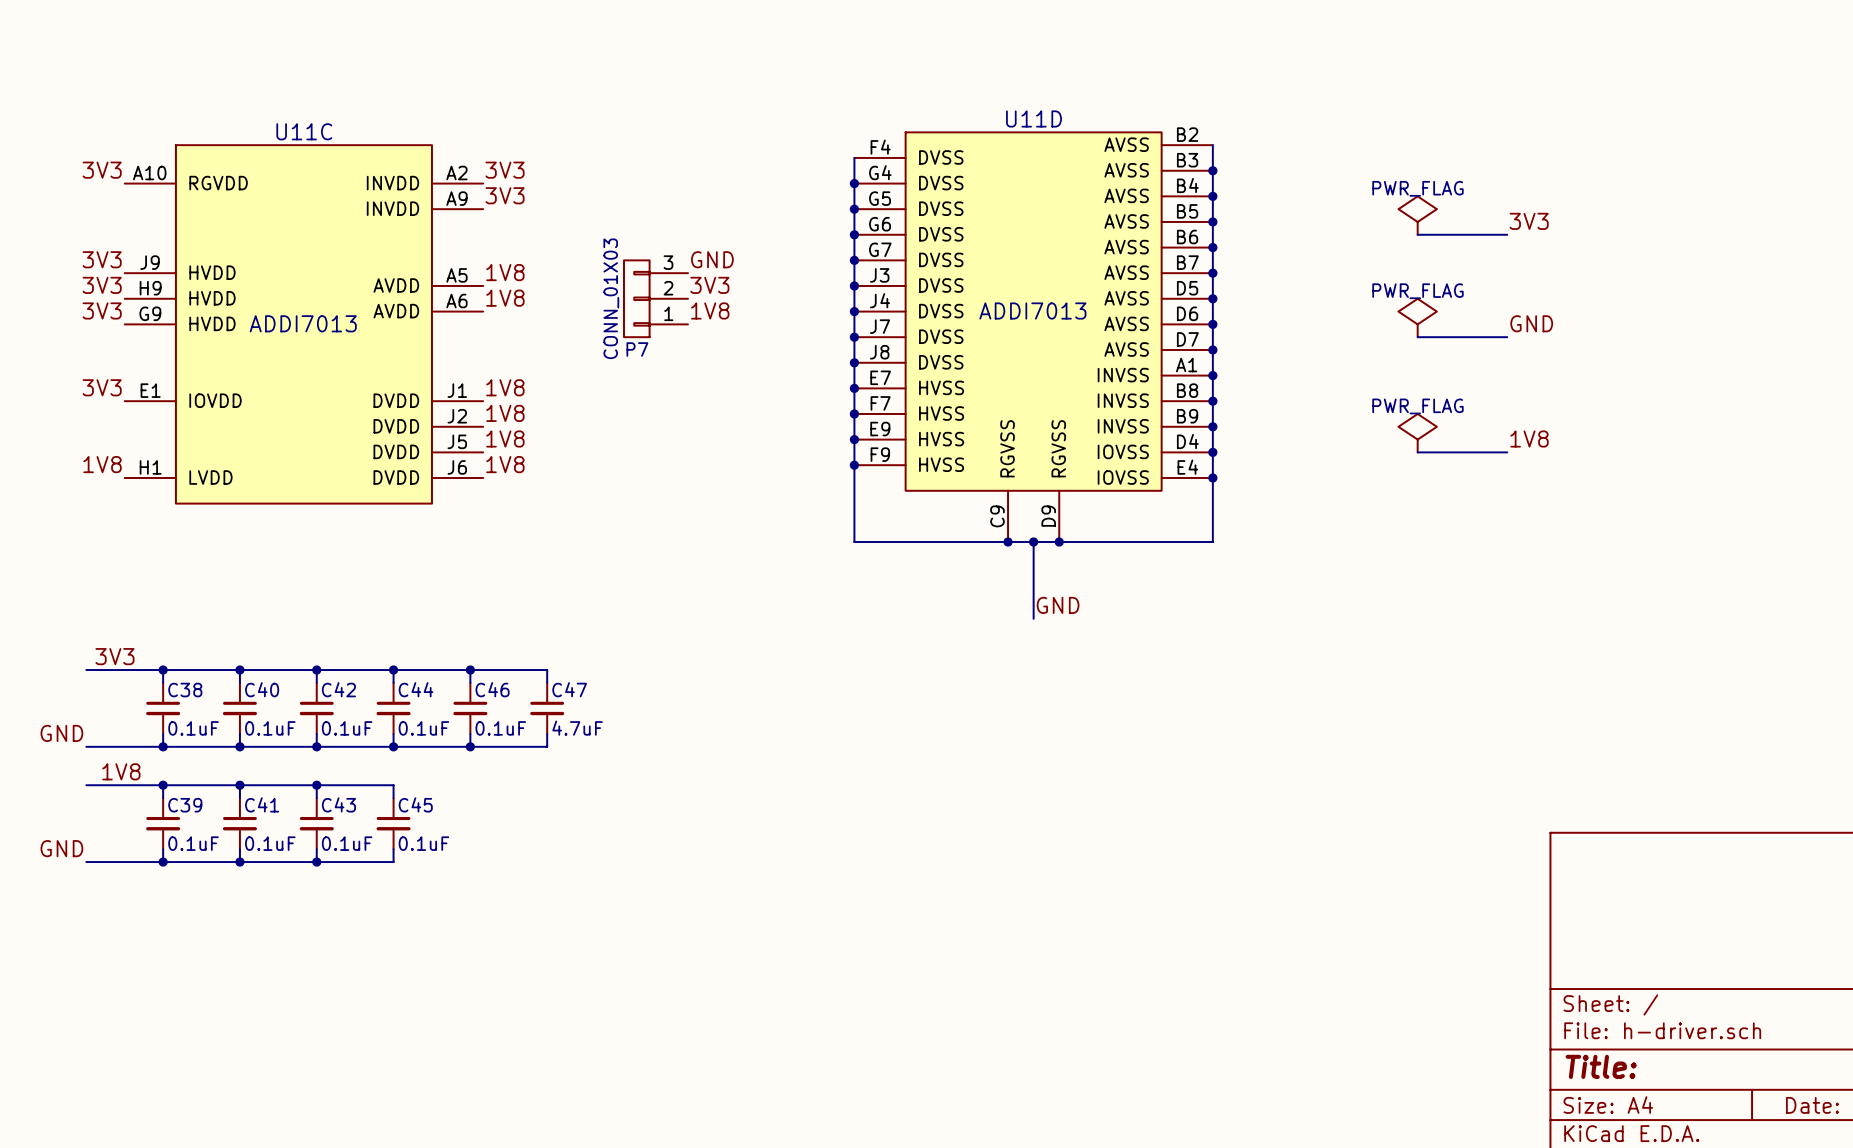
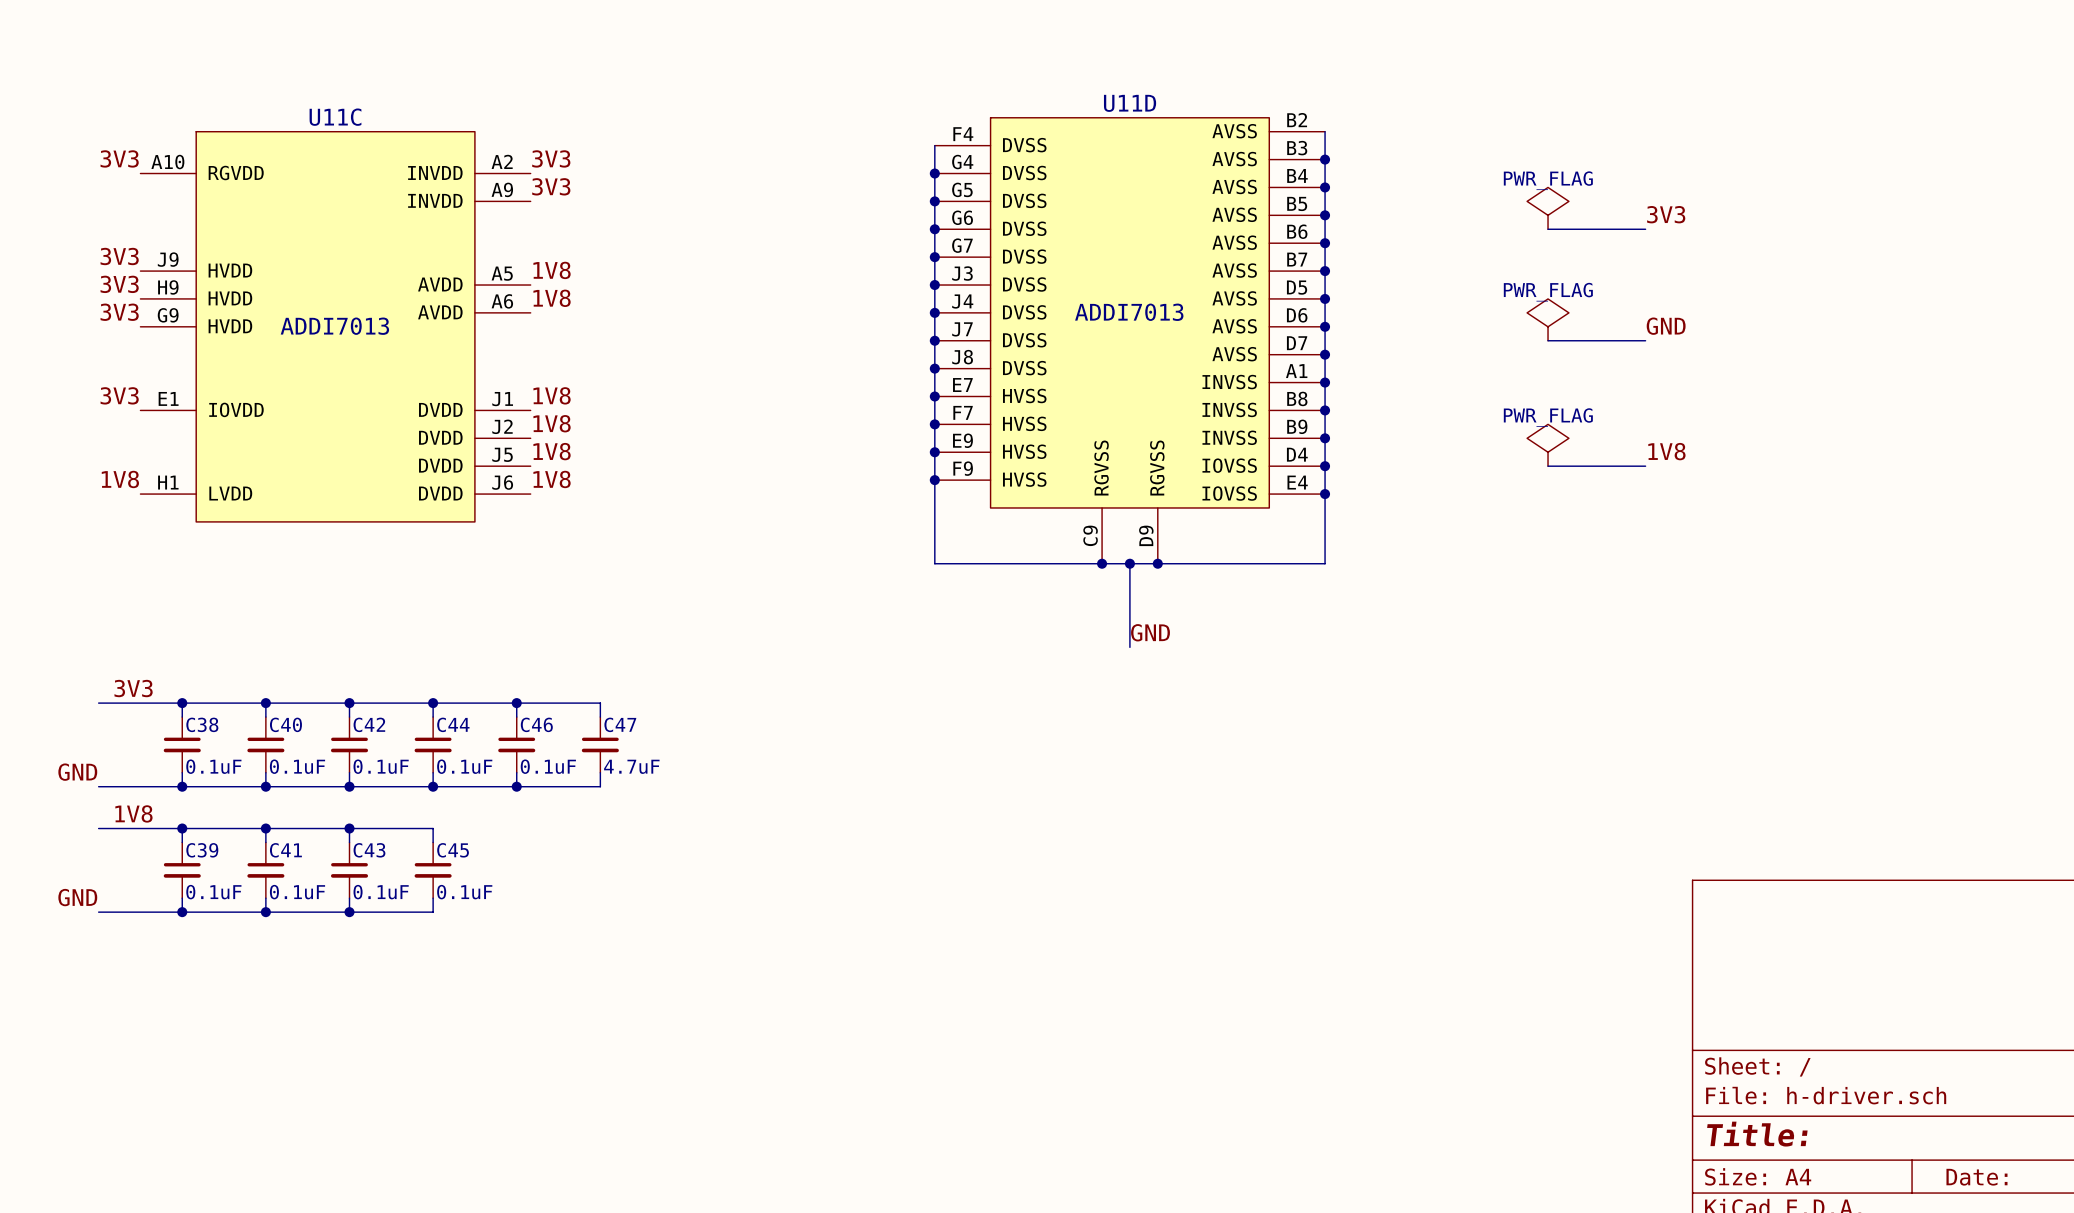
label: GND (712, 259) -> none
label: 3V3 (709, 285) -> none
P7: CONN_01X03 (655, 298) -> none
label: 1V8 (710, 310) -> none

